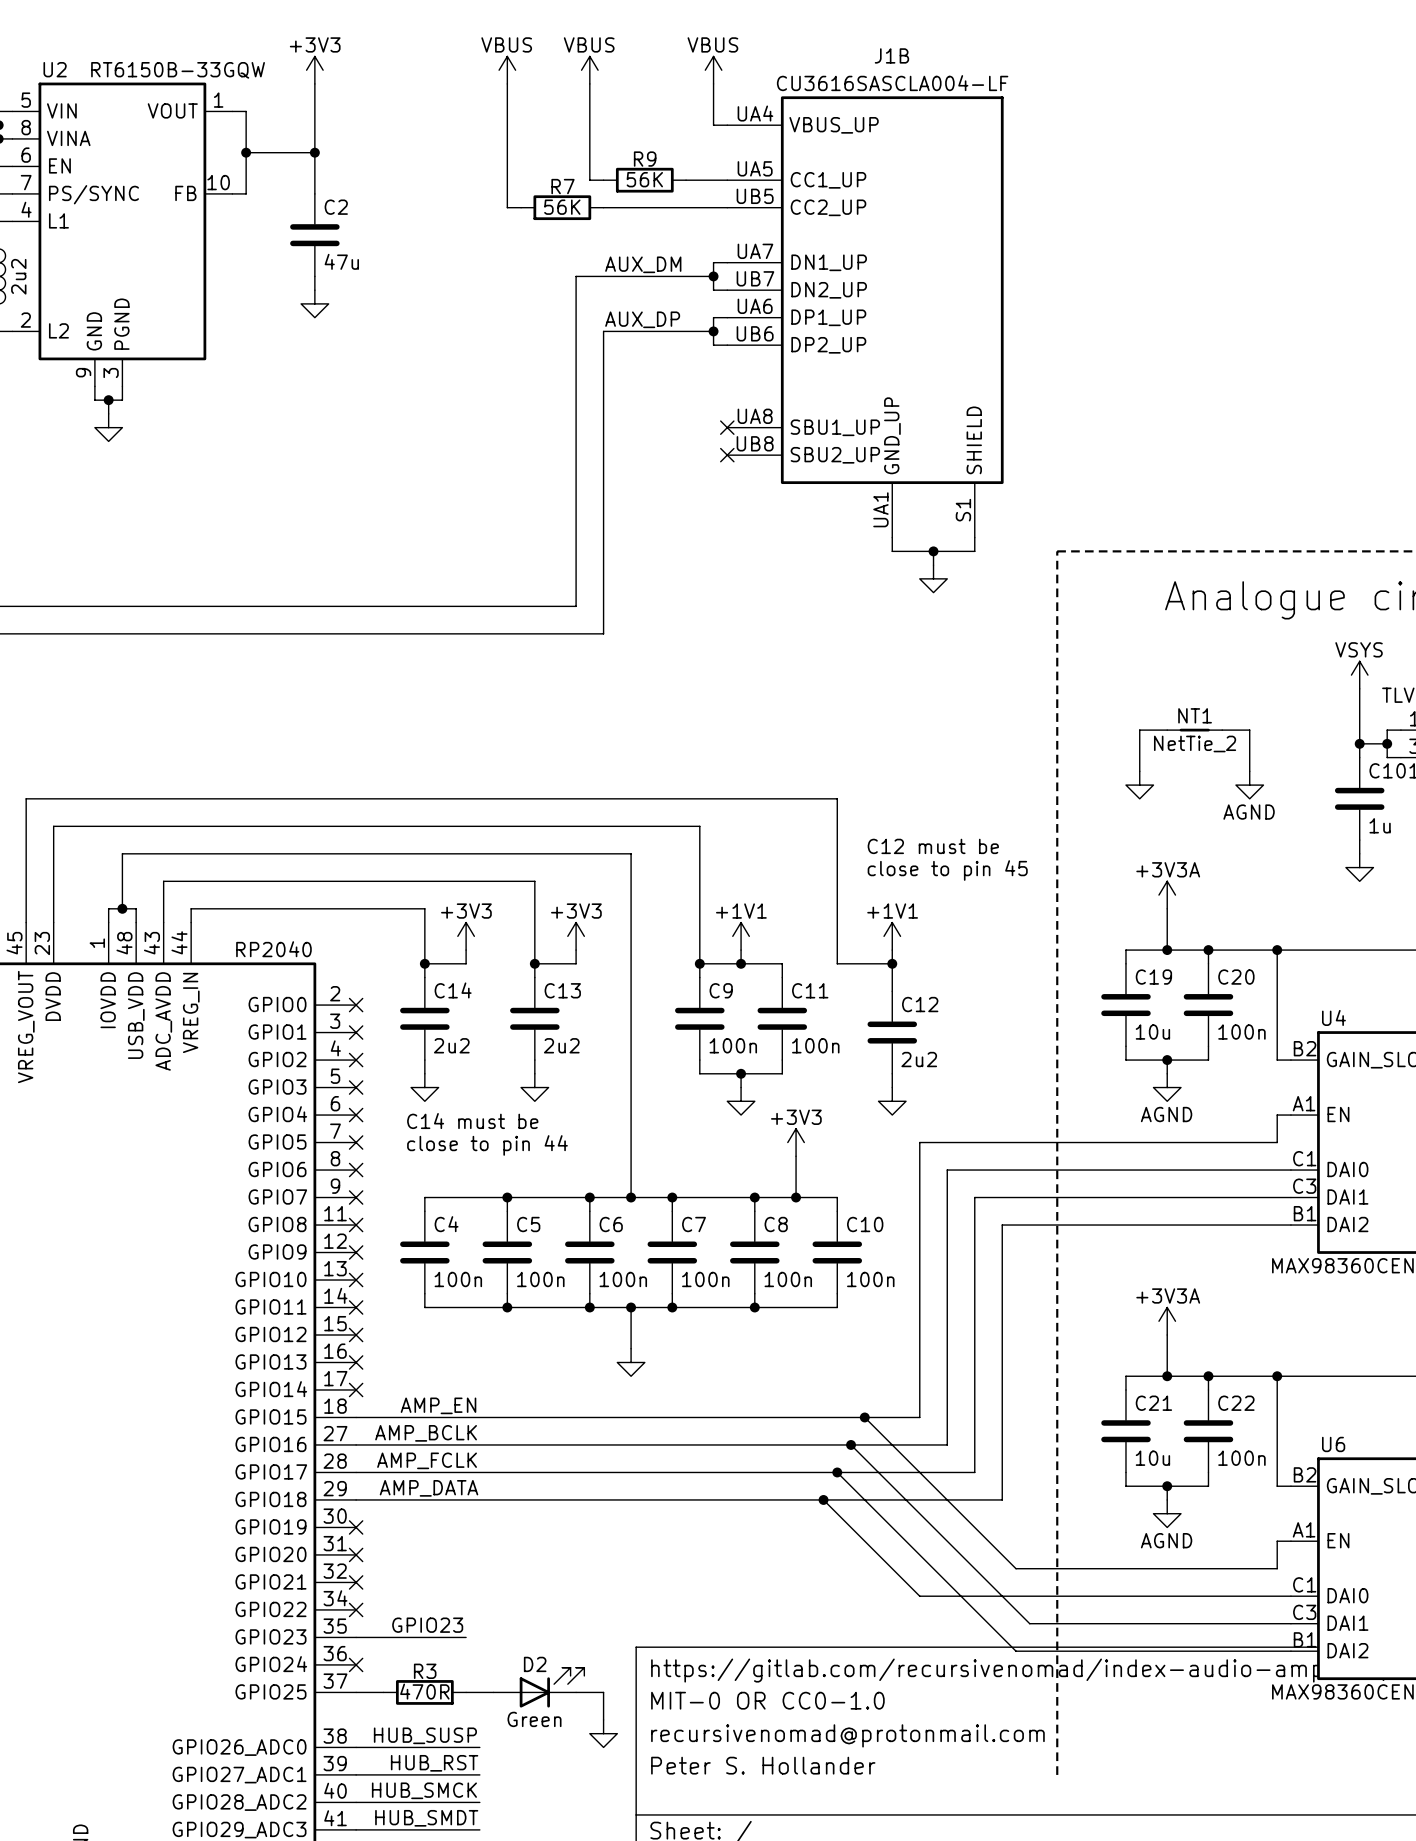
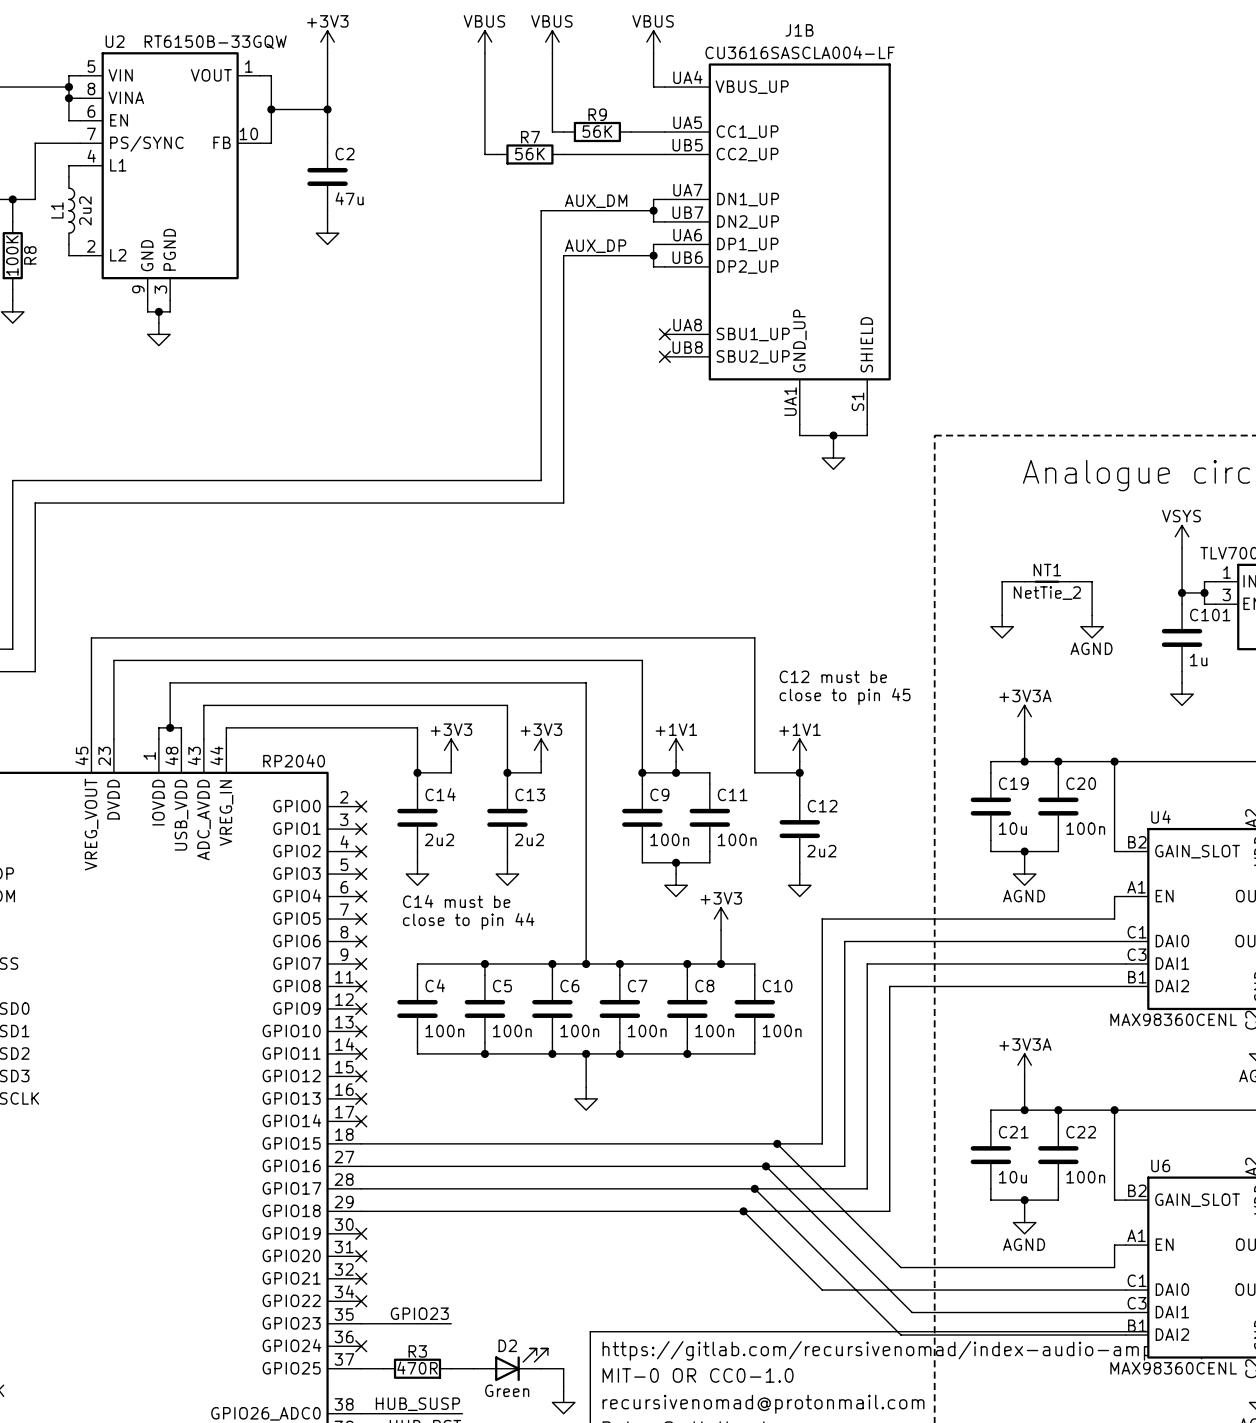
label: AMP_EN (438, 1405) -> none
label: AMP_BCLK (426, 1433) -> none
label: AMP_FCLK (427, 1460) -> none
label: AMP_DATA (429, 1488) -> none

